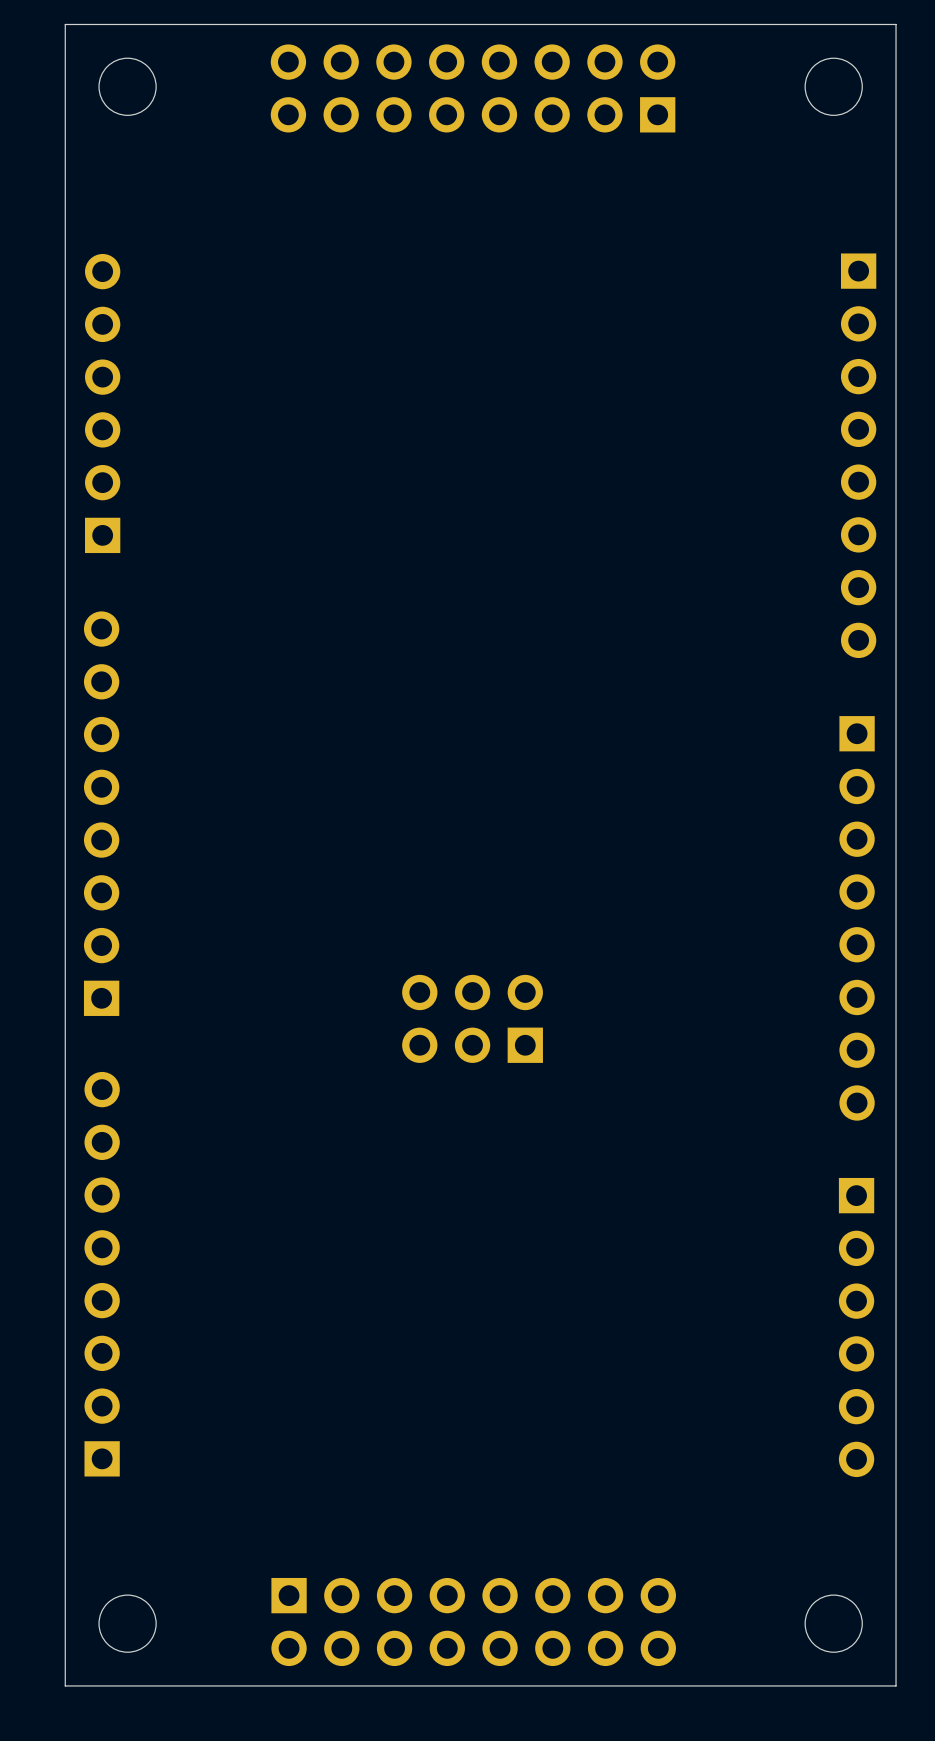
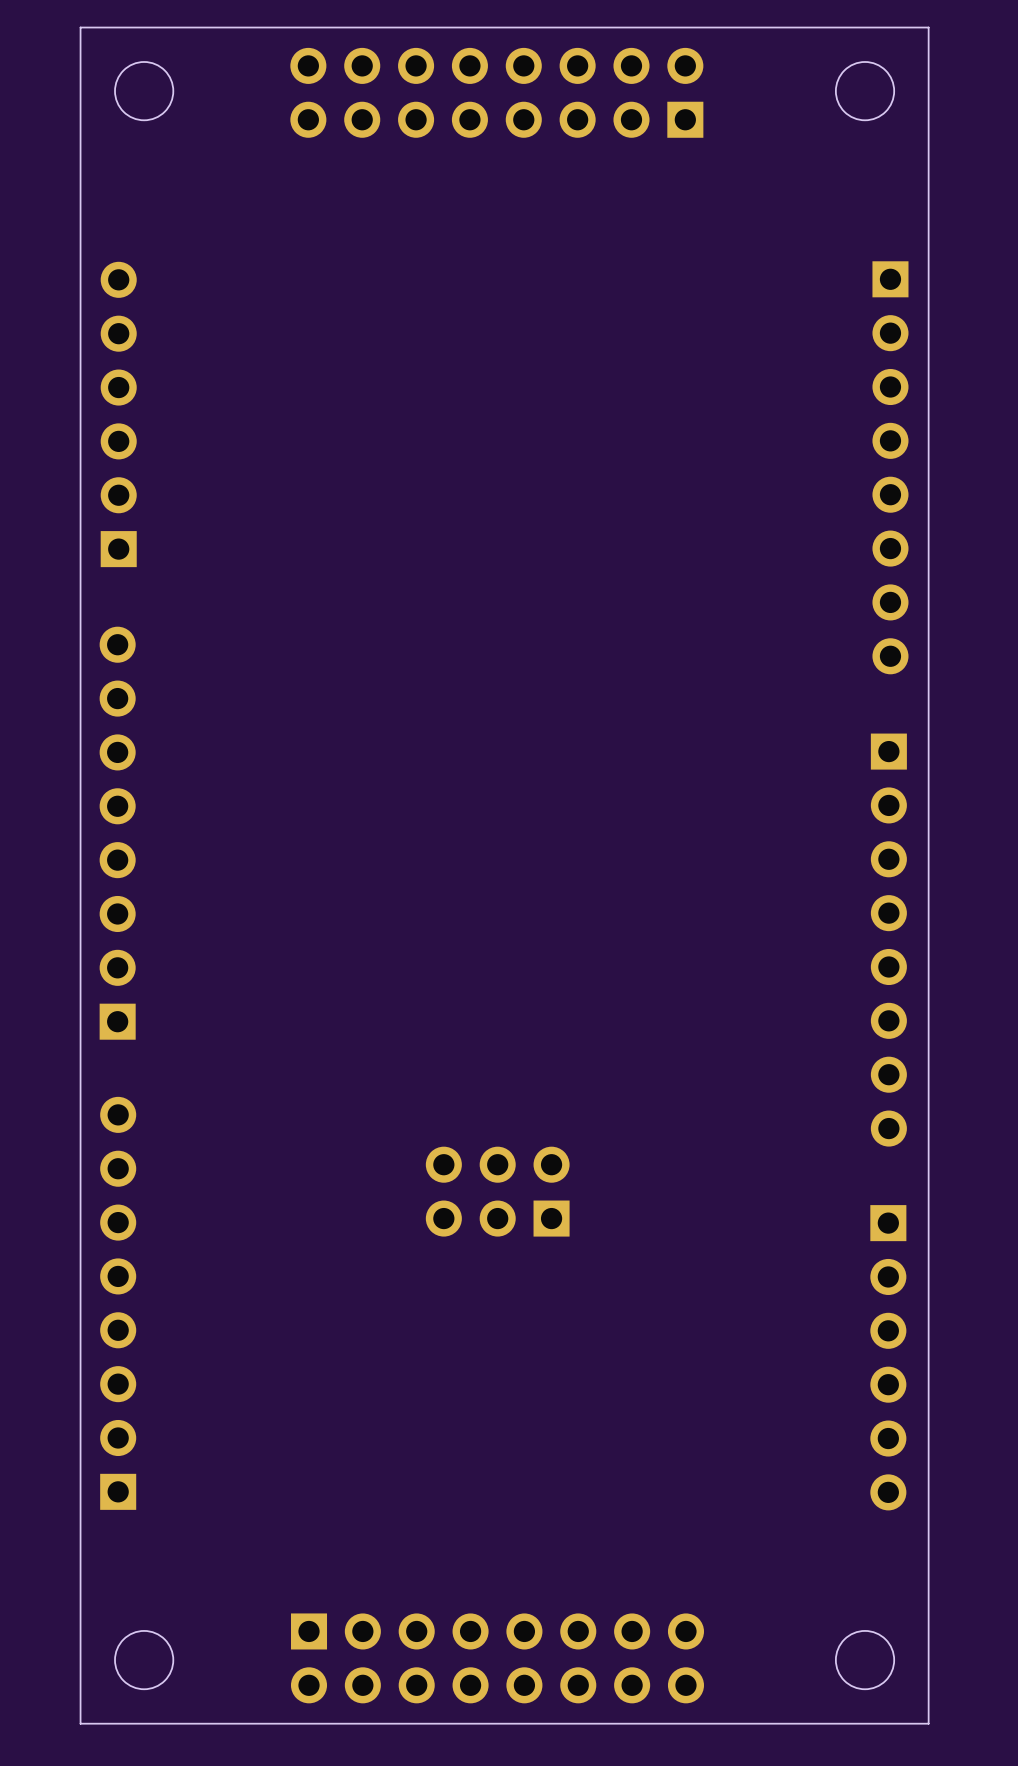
part position: (472, 1018) -> (497, 1191)

